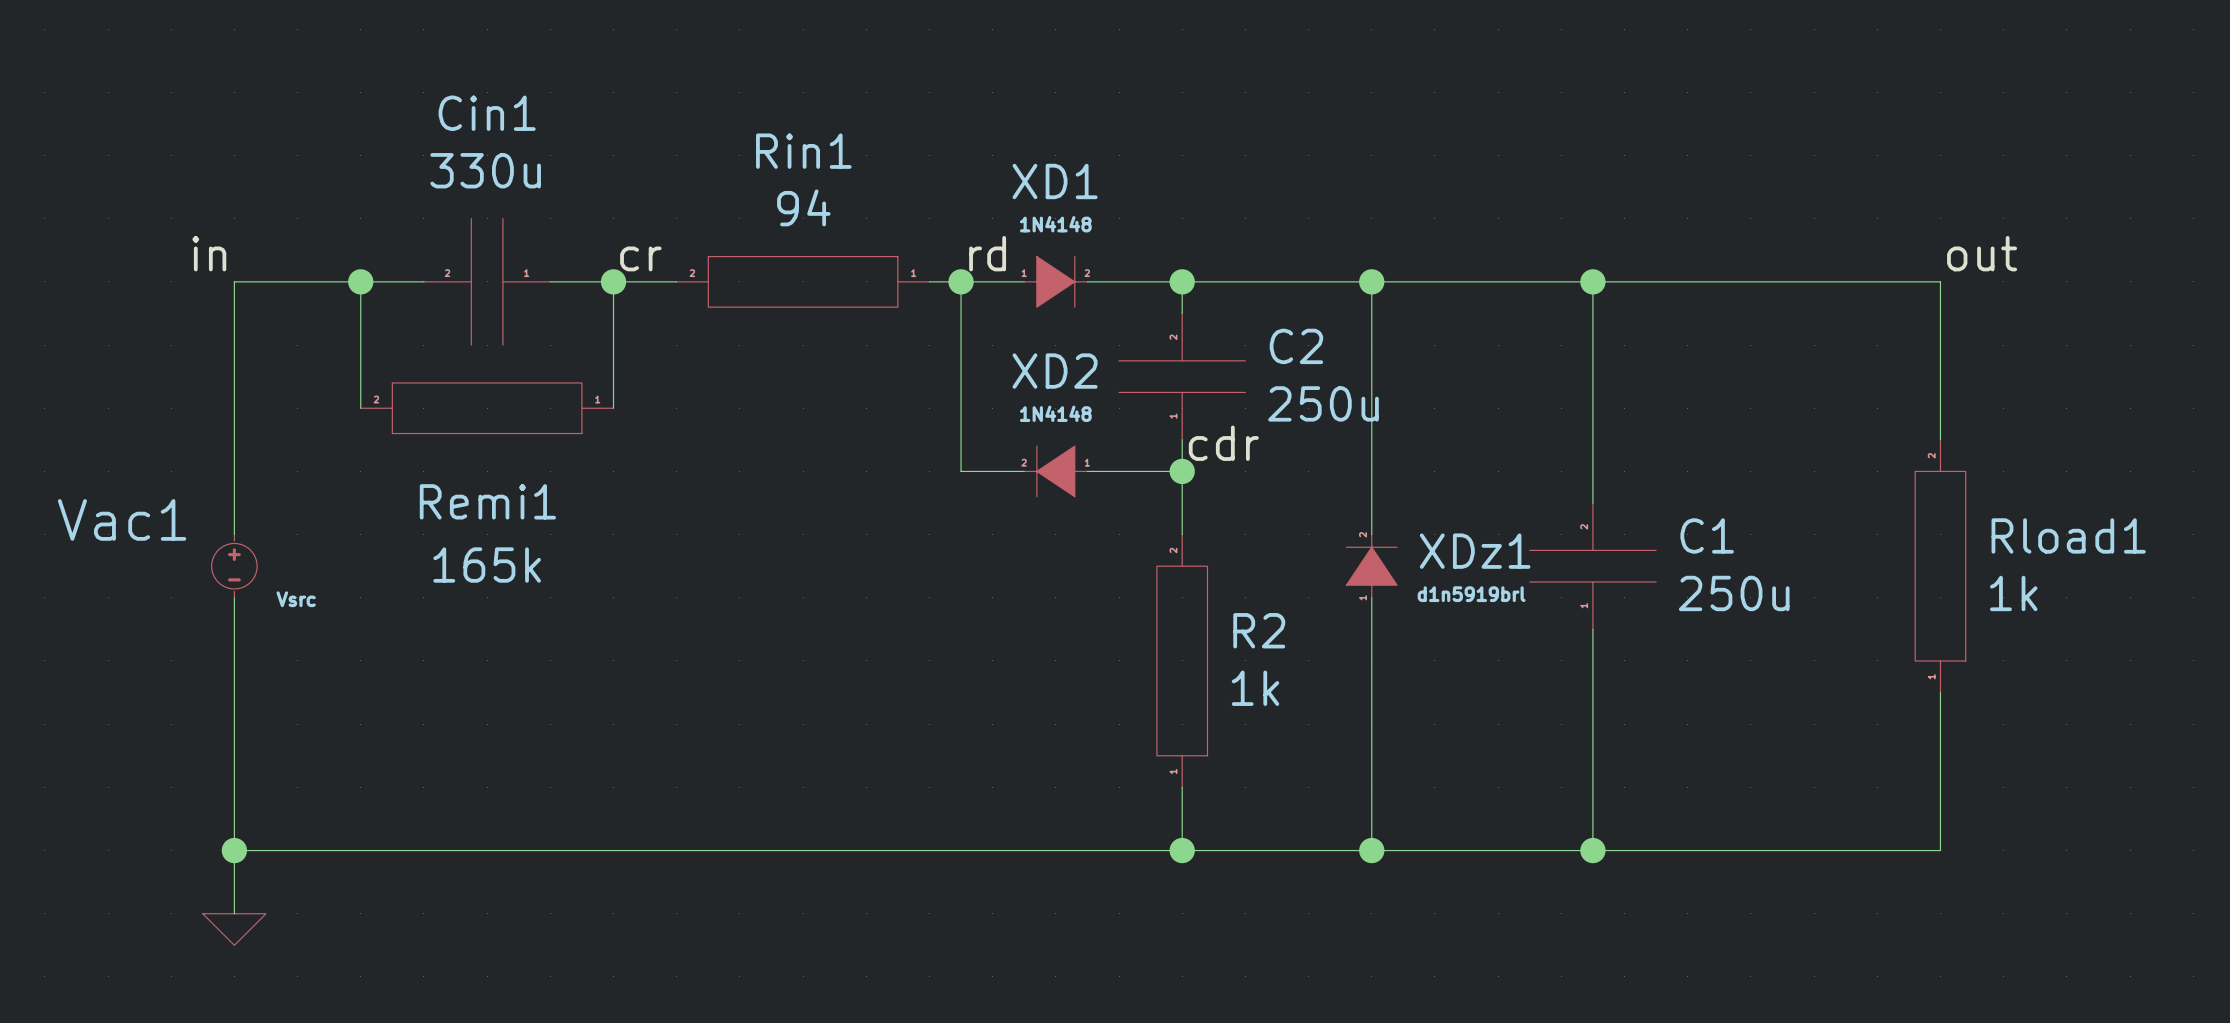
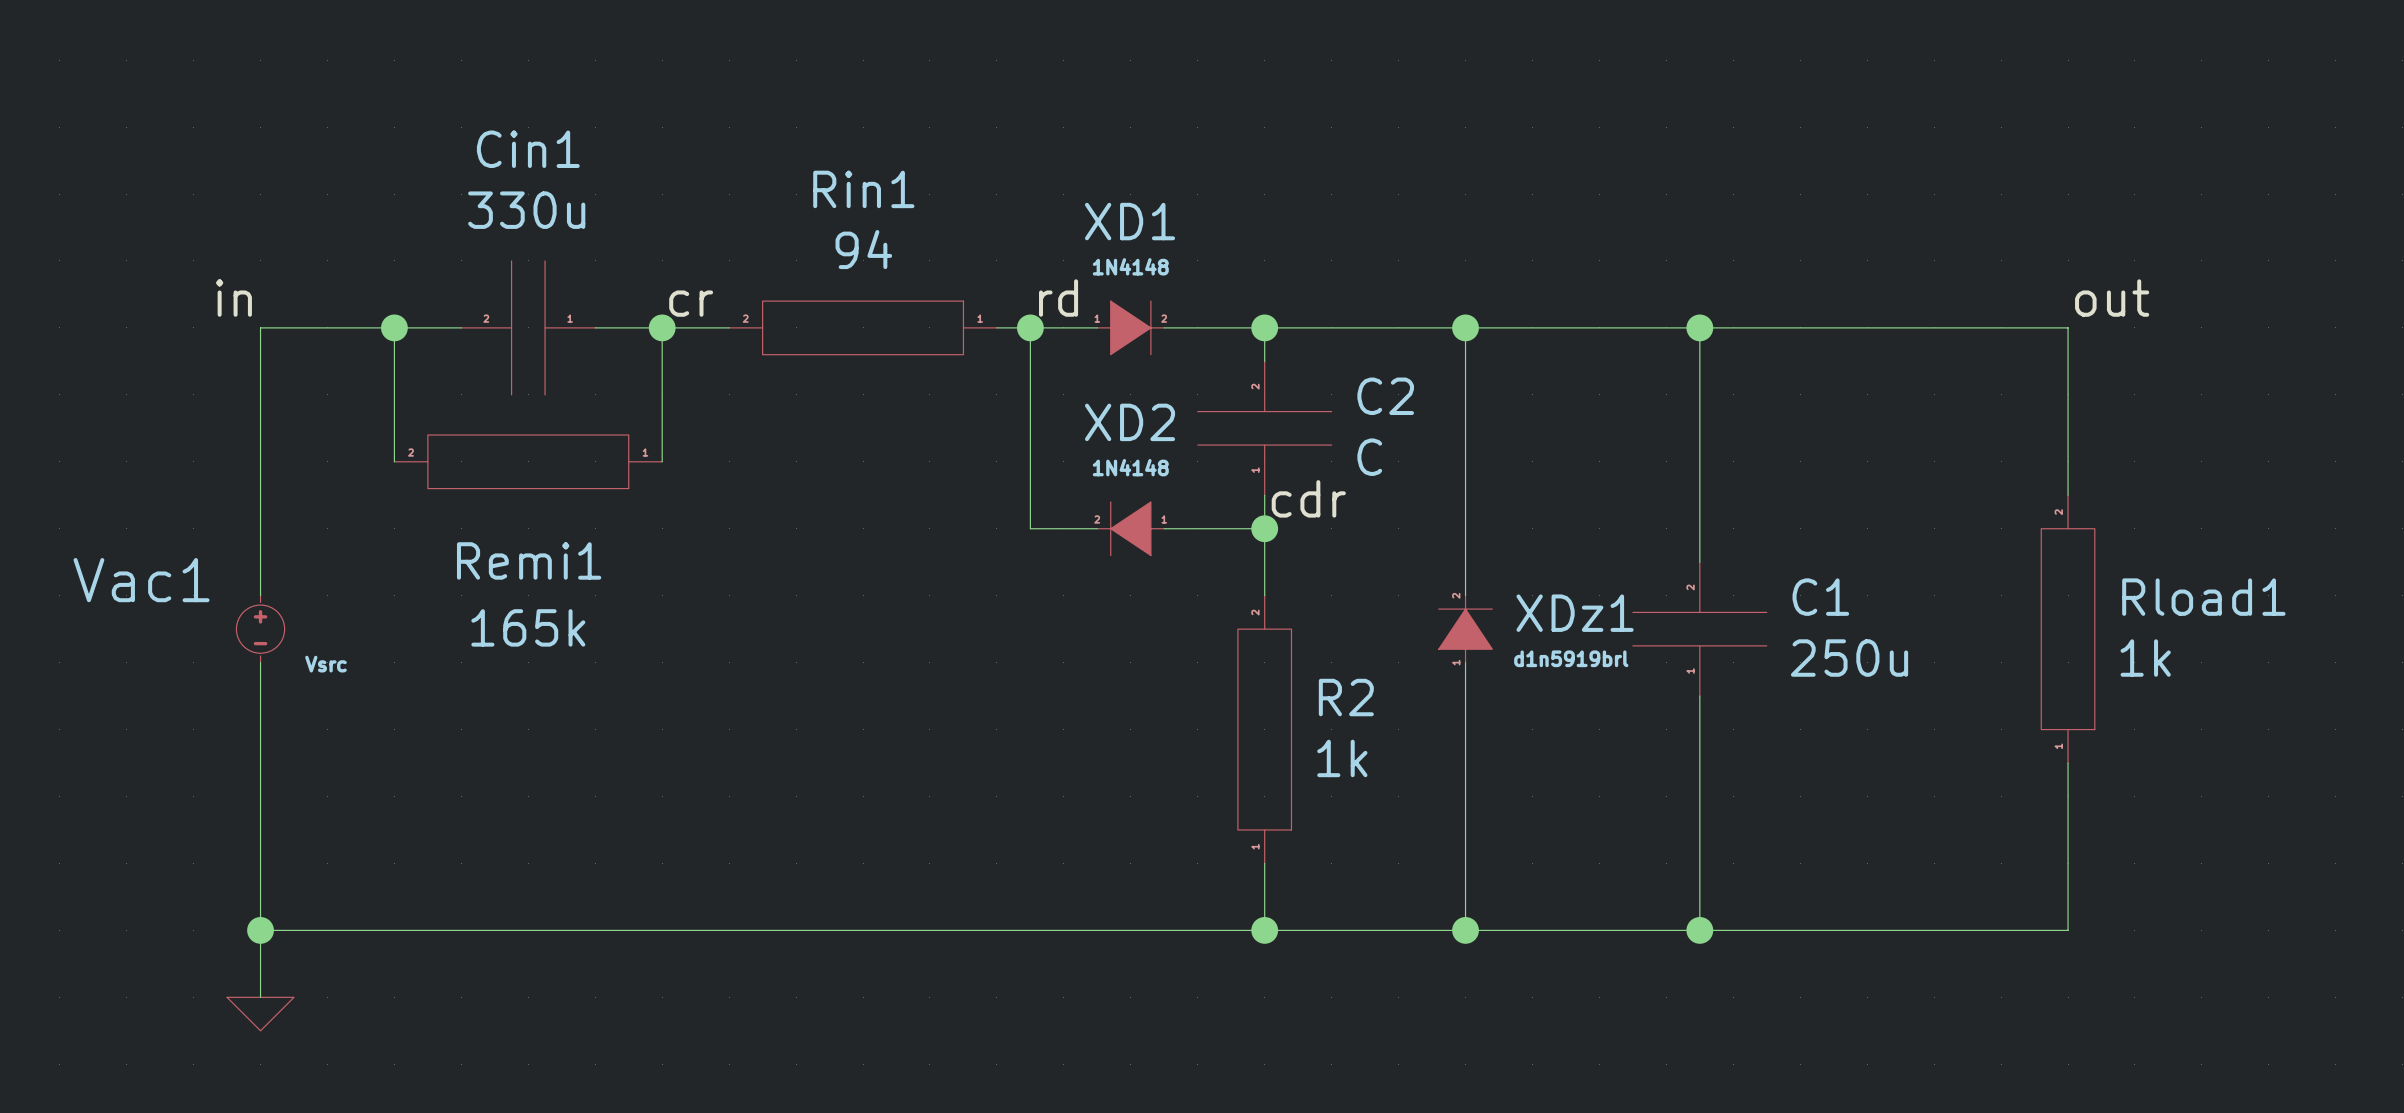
C2 value: 250u (1323, 403) -> C (1369, 457)

